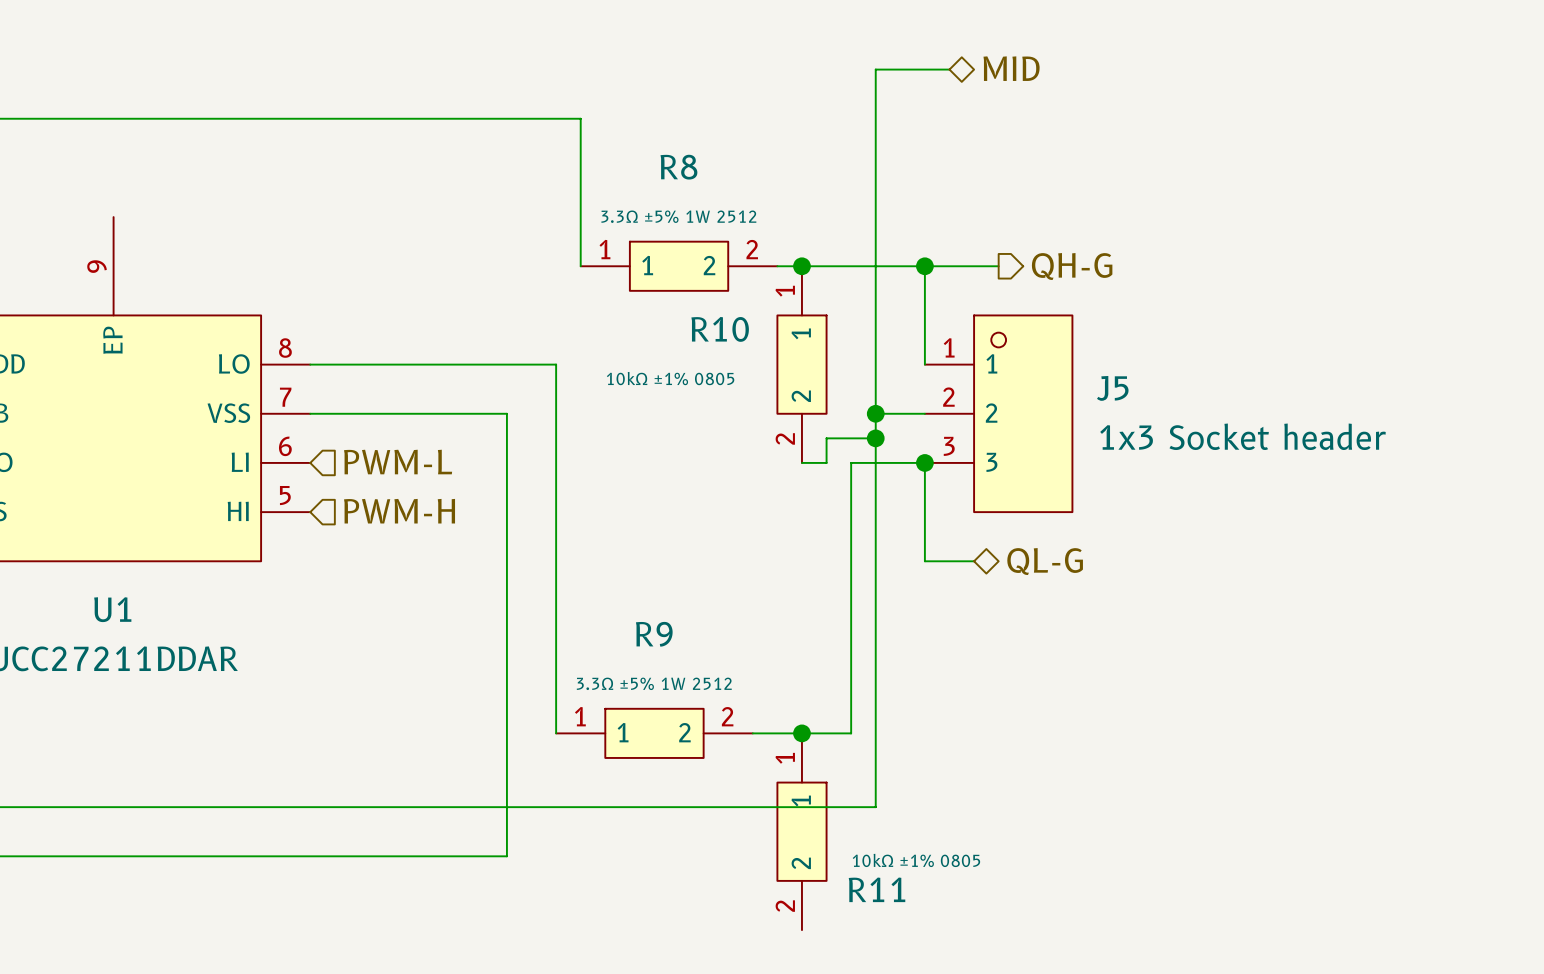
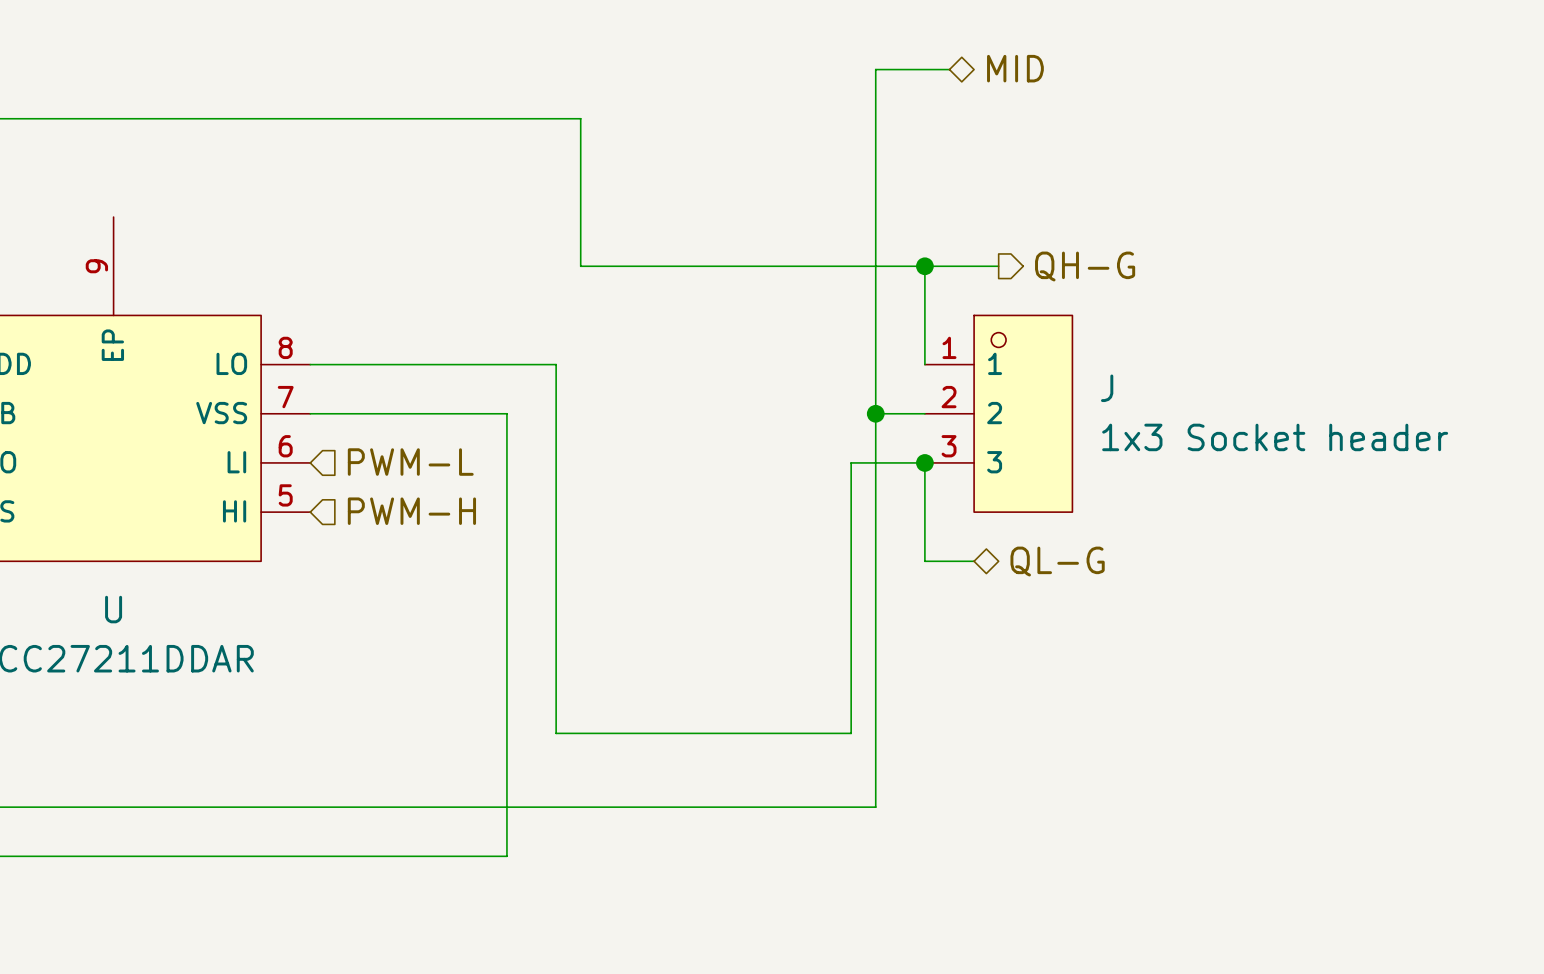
R8: 3.3Ω ±5% 1W 2512 (679, 266) -> none
junction: (801, 266) -> none
R10: 10kΩ ±1% 0805 (801, 364) -> none
J5 name: J5 (1112, 388) -> J (1107, 388)
wire: (875, 438) (826, 438) (826, 462) (801, 462) -> none
junction: (875, 438) -> none
U1 name: U1 (112, 609) -> U (113, 609)
R9: 3.3Ω ±5% 1W 2512 (654, 733) -> none
junction: (801, 733) -> none
R11: 10kΩ ±1% 0805 (801, 831) -> none

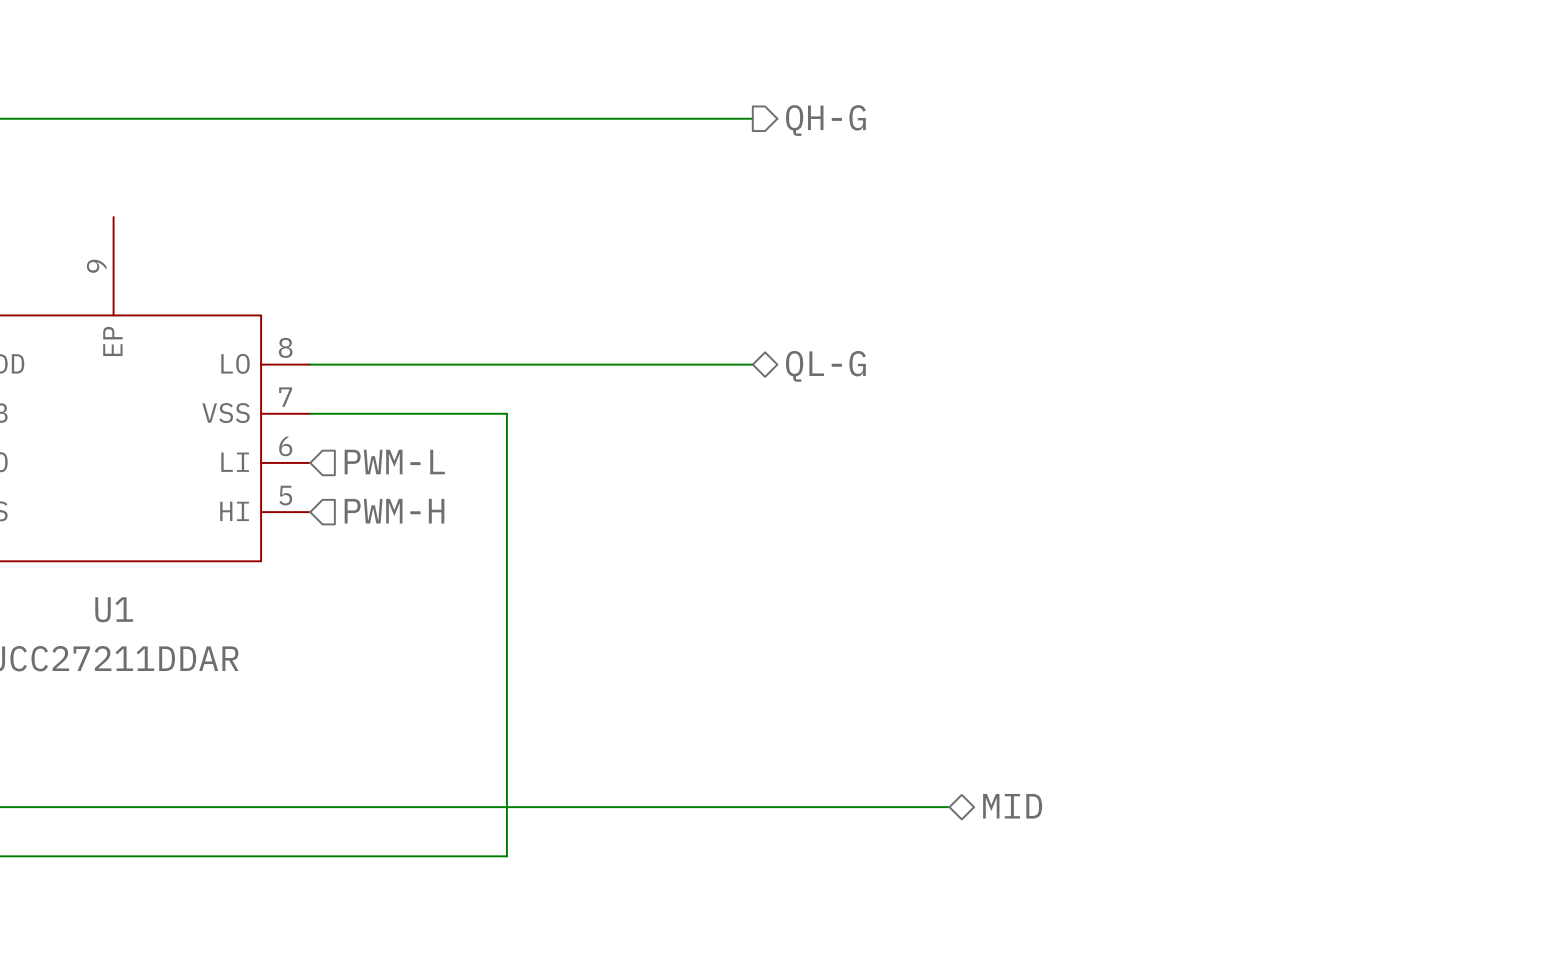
hierarchical label: MID (1015, 68) -> none
wire: (949, 69) (875, 69) (875, 807) -> (949, 807) (875, 807)
wire: (580, 118) (580, 266) (998, 266) -> (580, 118) (752, 118)
wire: (924, 266) (924, 364) -> none
junction: (924, 266) -> none
hierarchical label position: QH-G (1085, 266) -> QH-G (825, 120)
wire: (556, 364) (556, 733) (851, 733) (851, 462) (924, 462) (924, 561) (974, 561) -> (556, 364) (752, 364)
wire: (875, 413) (924, 413) -> none
junction: (875, 413) -> none
J: 1x3 Socket header (998, 413) -> none
junction: (924, 462) -> none
hierarchical label position: QL-G (1057, 561) -> QL-G (825, 366)
U name: U (113, 609) -> U1 (114, 609)
hierarchical label: none -> MID (1012, 806)

